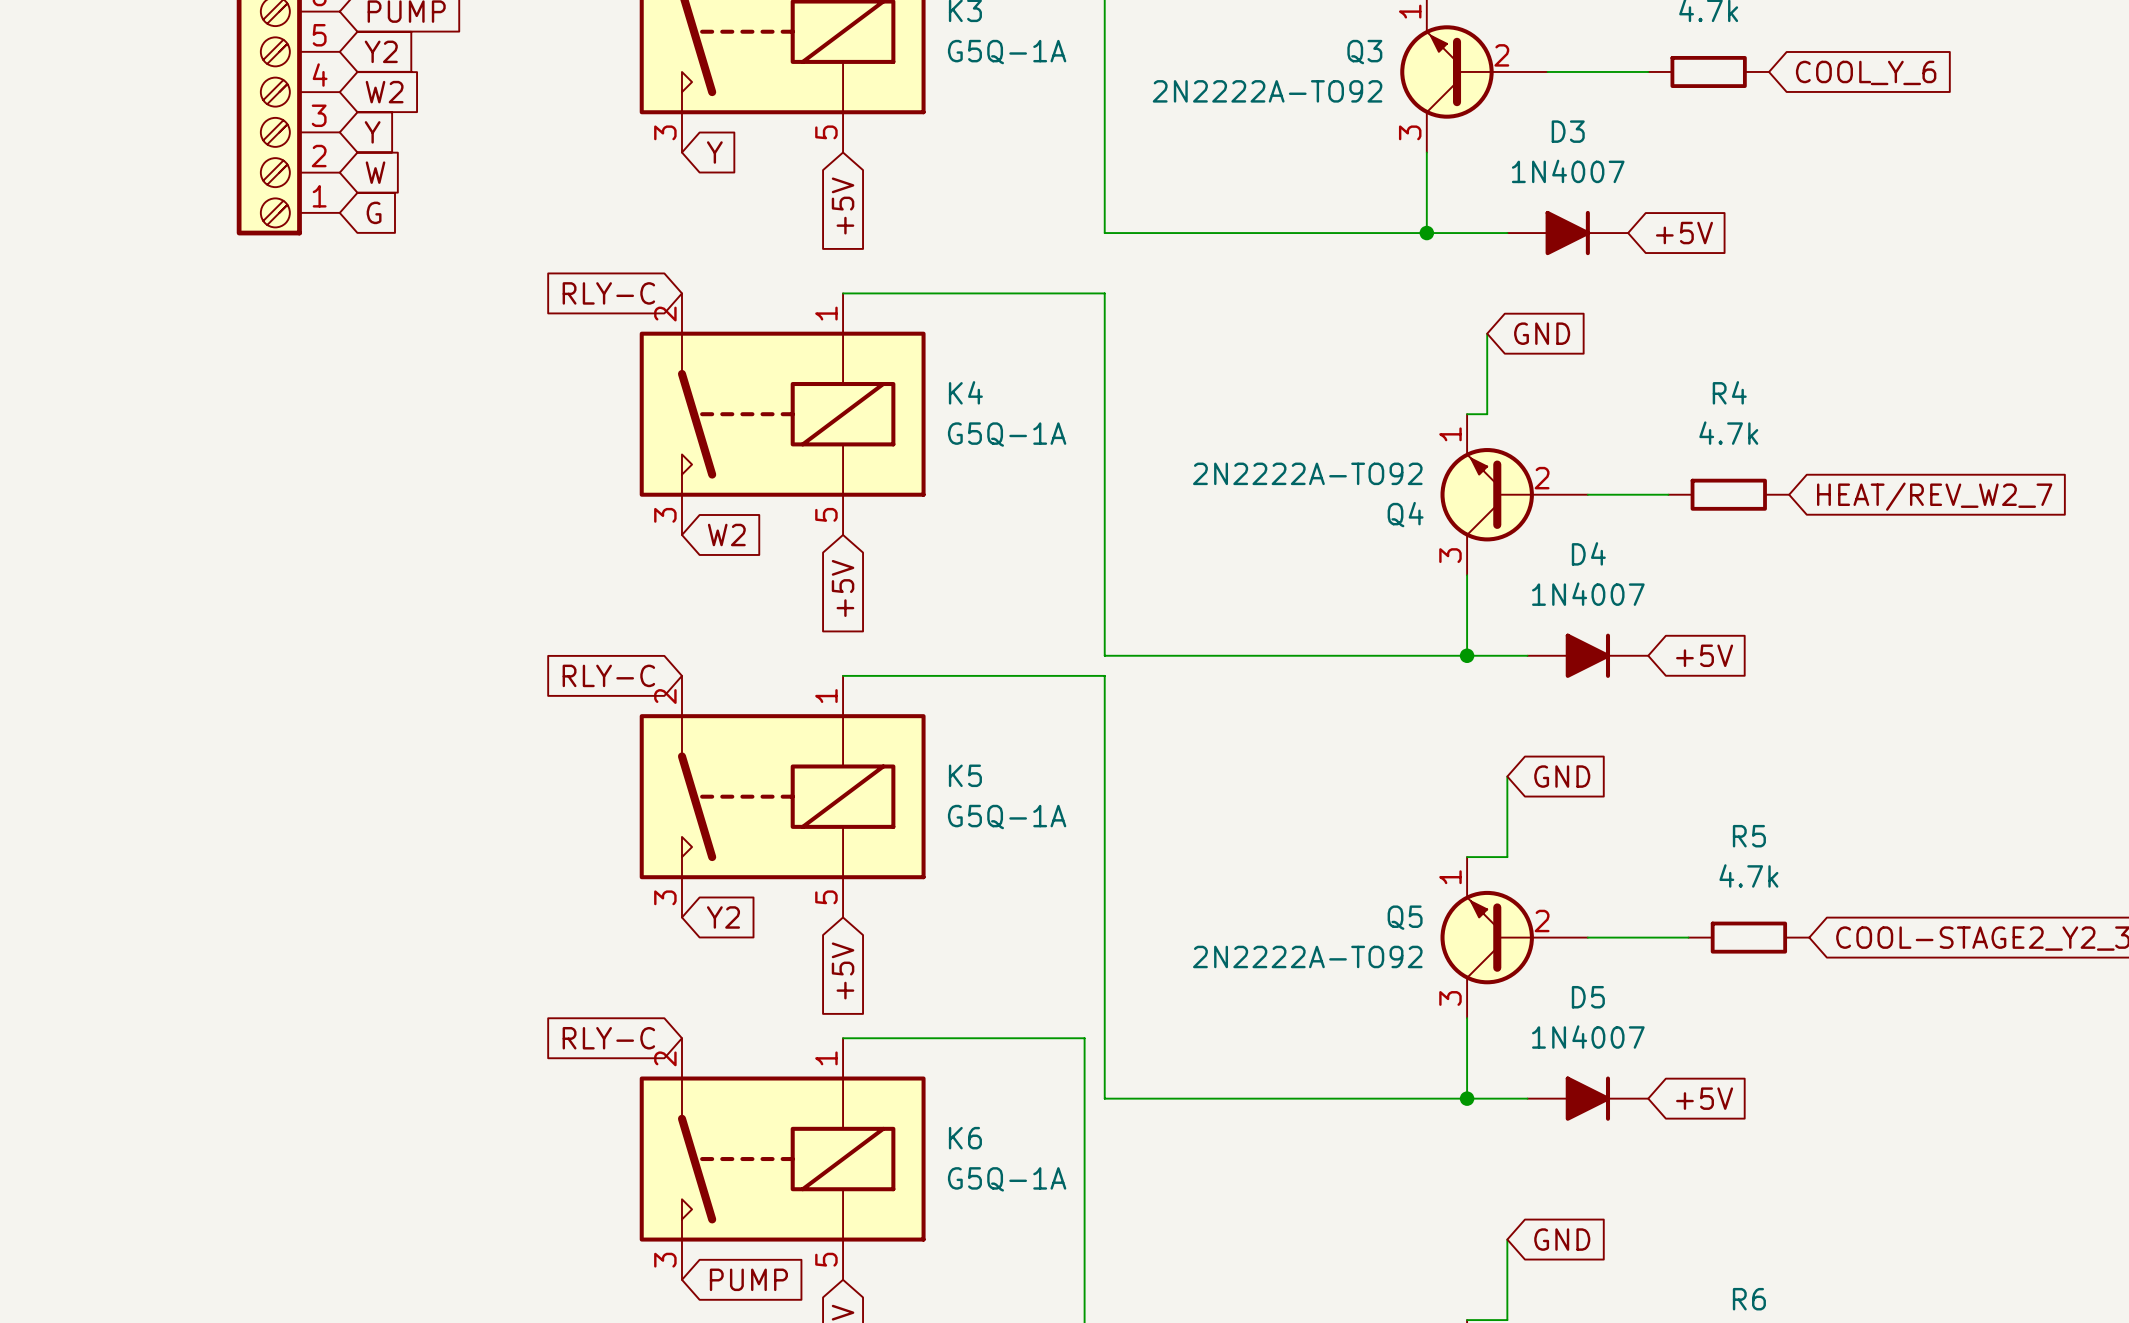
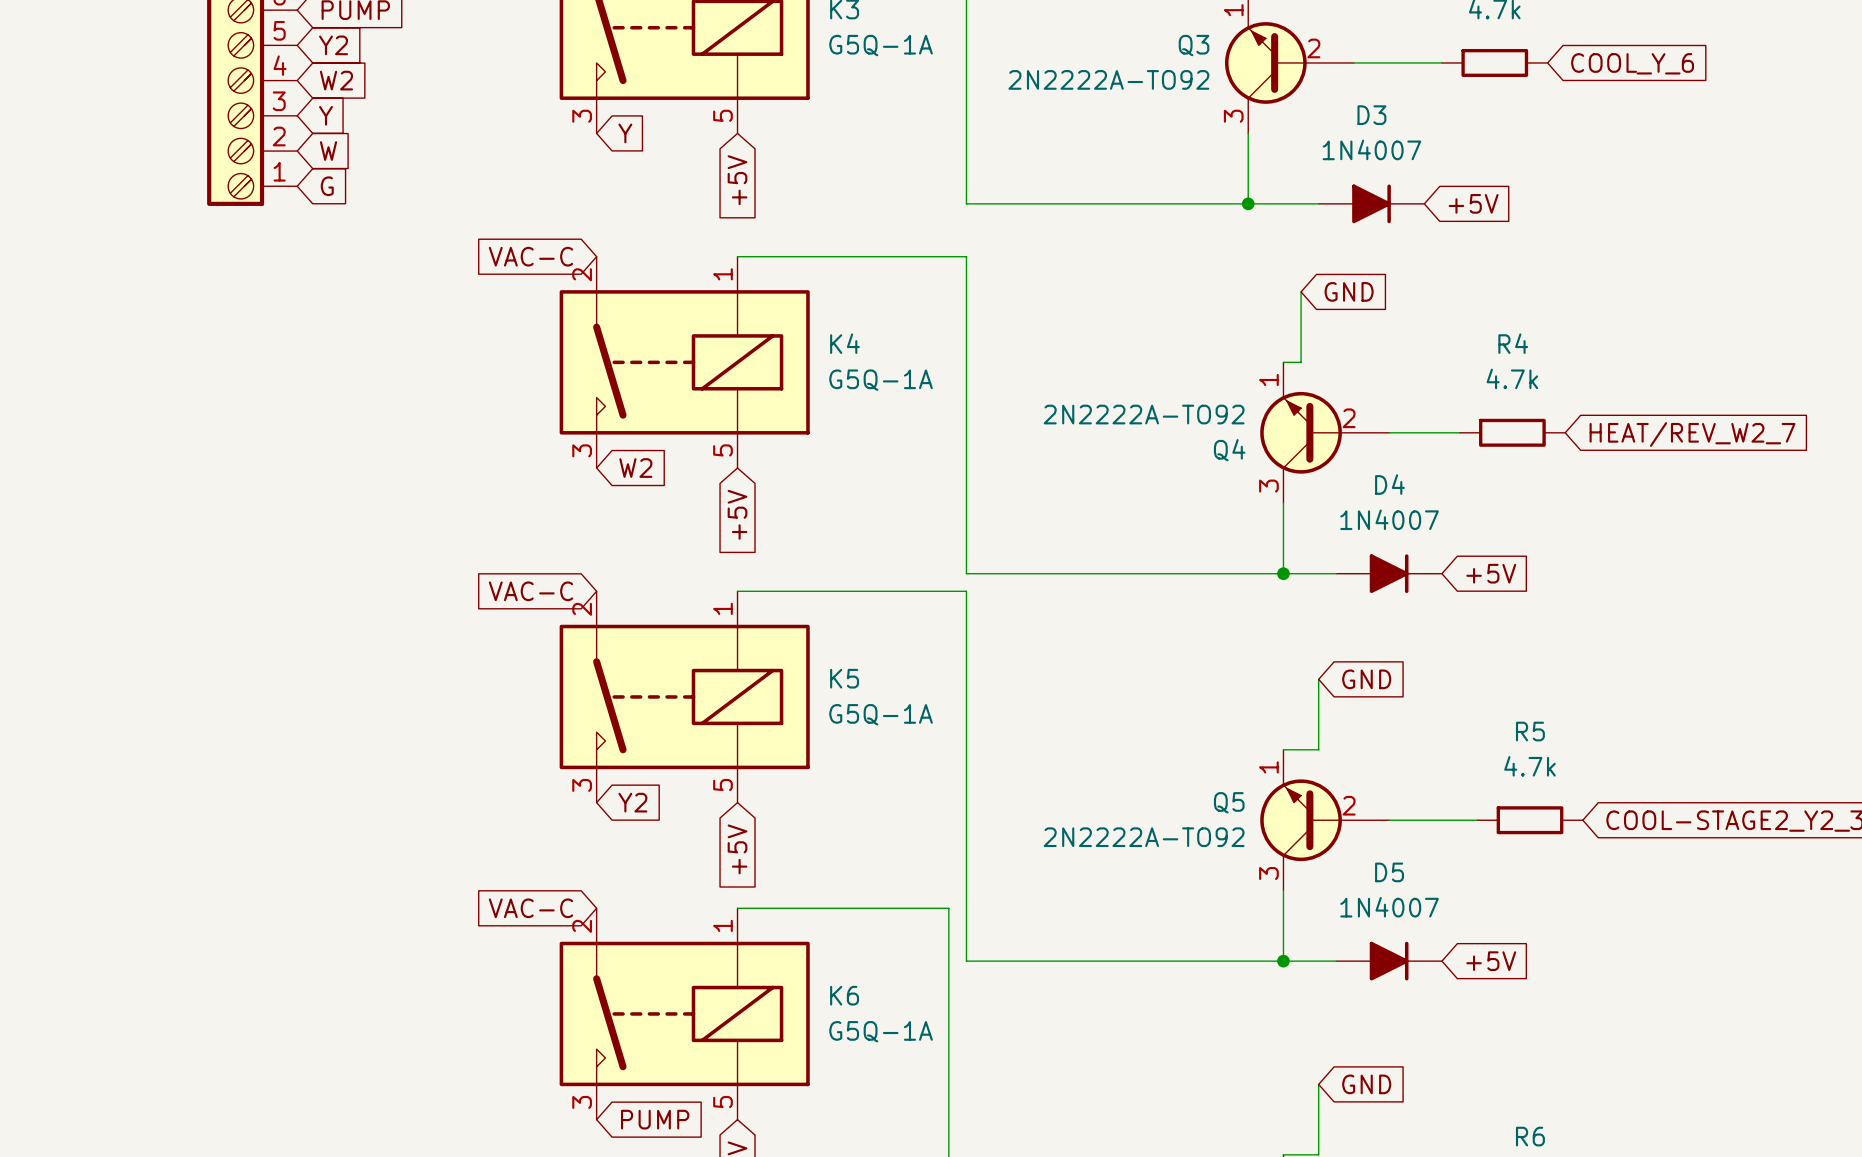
global label: RLY-C (608, 293) -> VAC-C (530, 256)
global label: RLY-C (608, 675) -> VAC-C (530, 591)
global label: RLY-C (608, 1038) -> VAC-C (530, 908)

